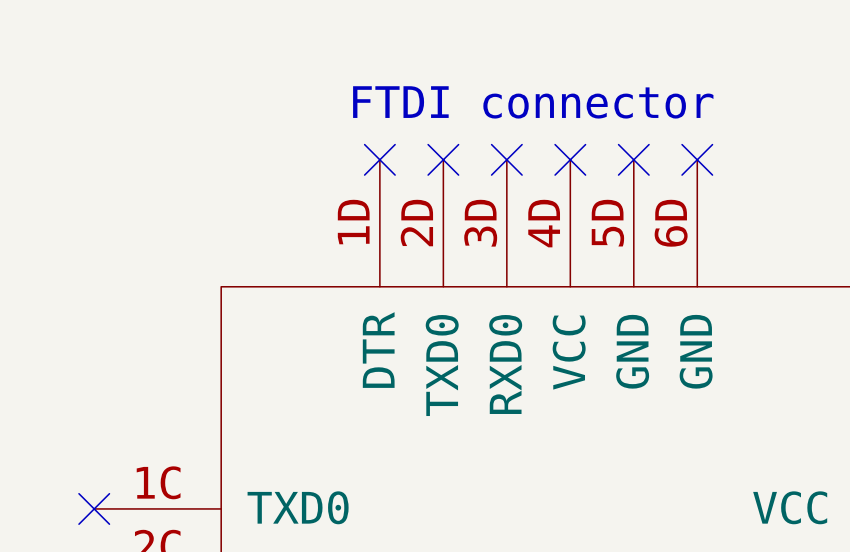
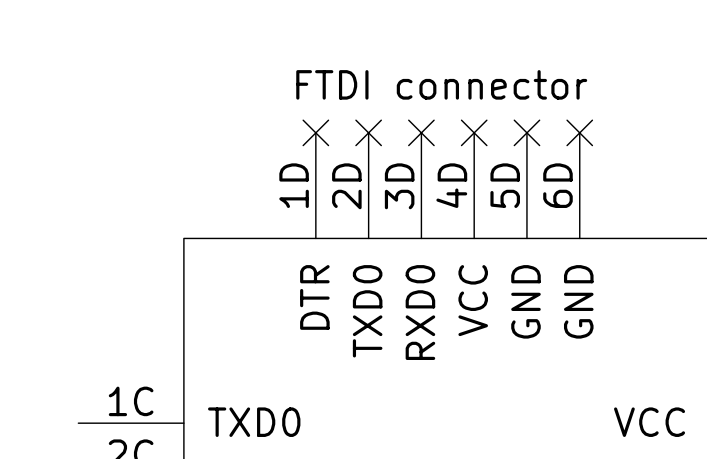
no-connect mark: (94, 508) -> none

